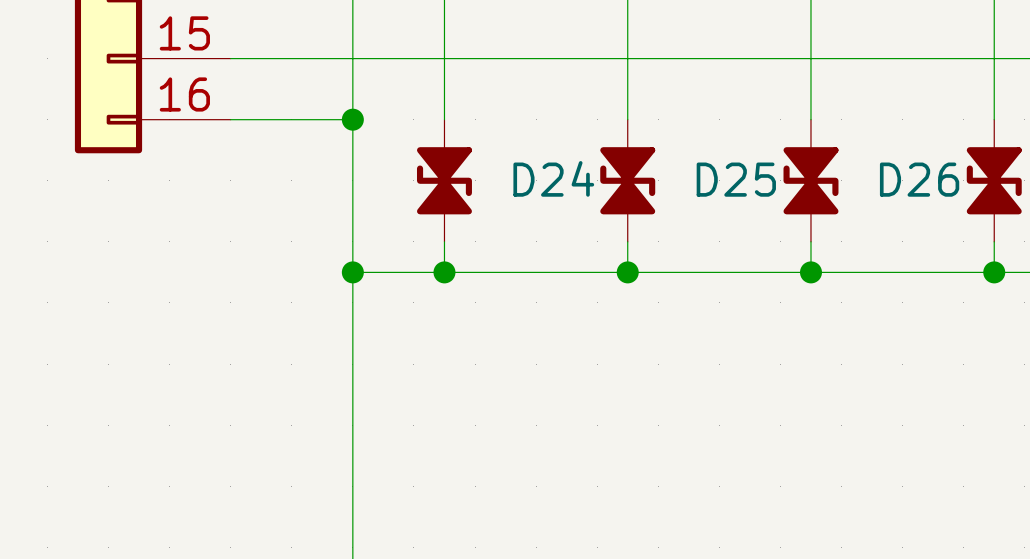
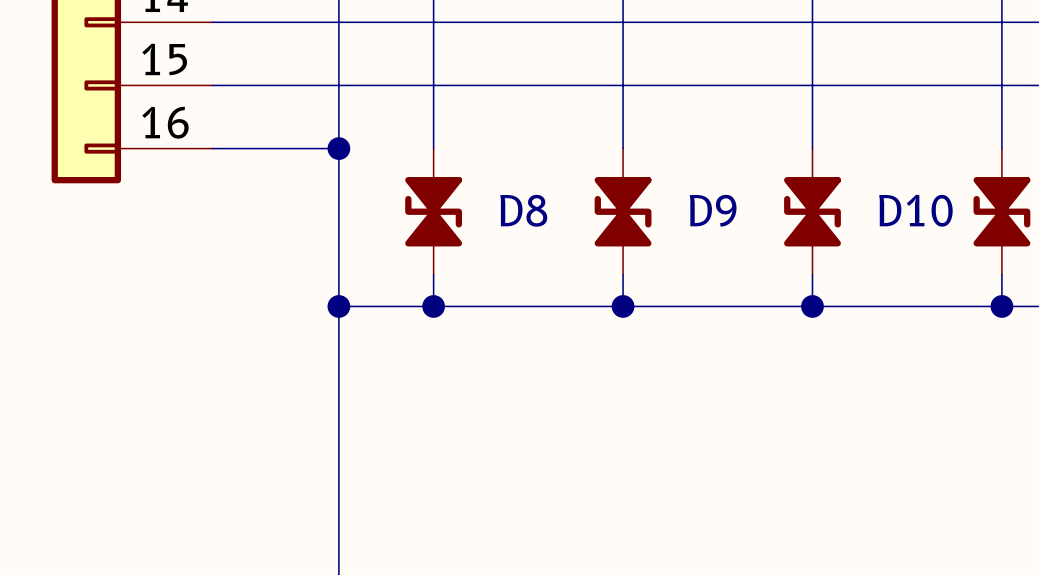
D24 name: D24 (553, 178) -> D8 (523, 210)
D25 name: D25 (736, 179) -> D9 (713, 210)
D26 name: D26 (919, 179) -> D10 (915, 210)

